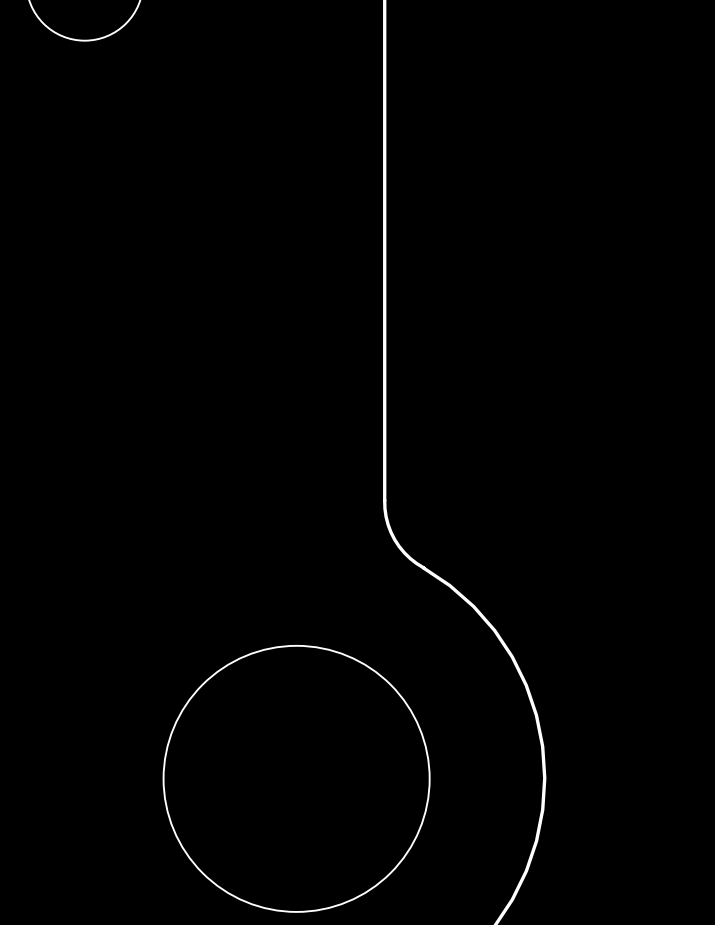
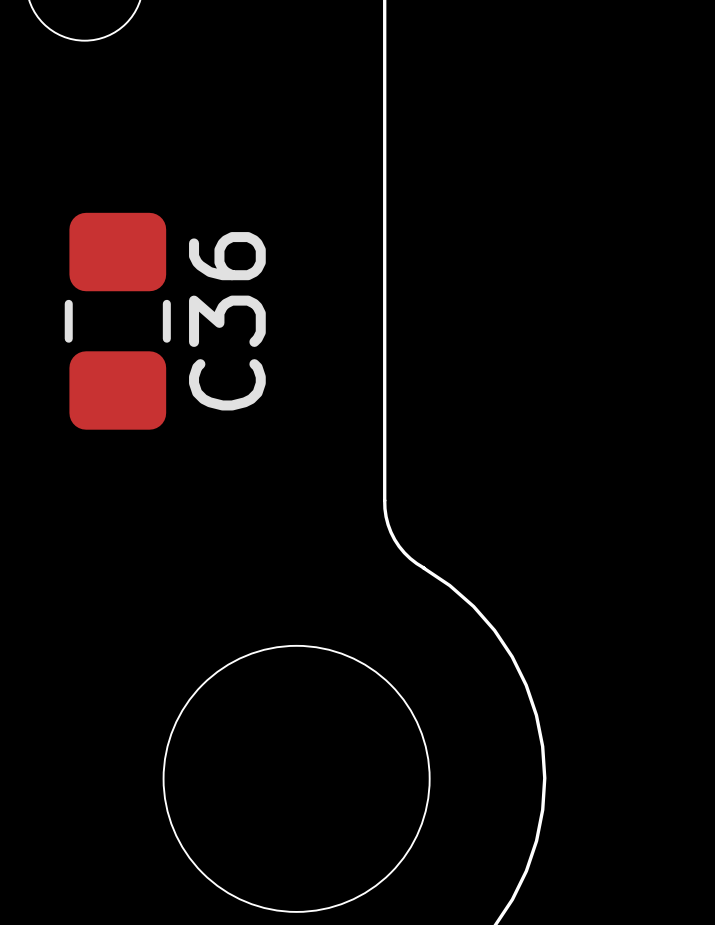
C36: none -> (117, 321)

